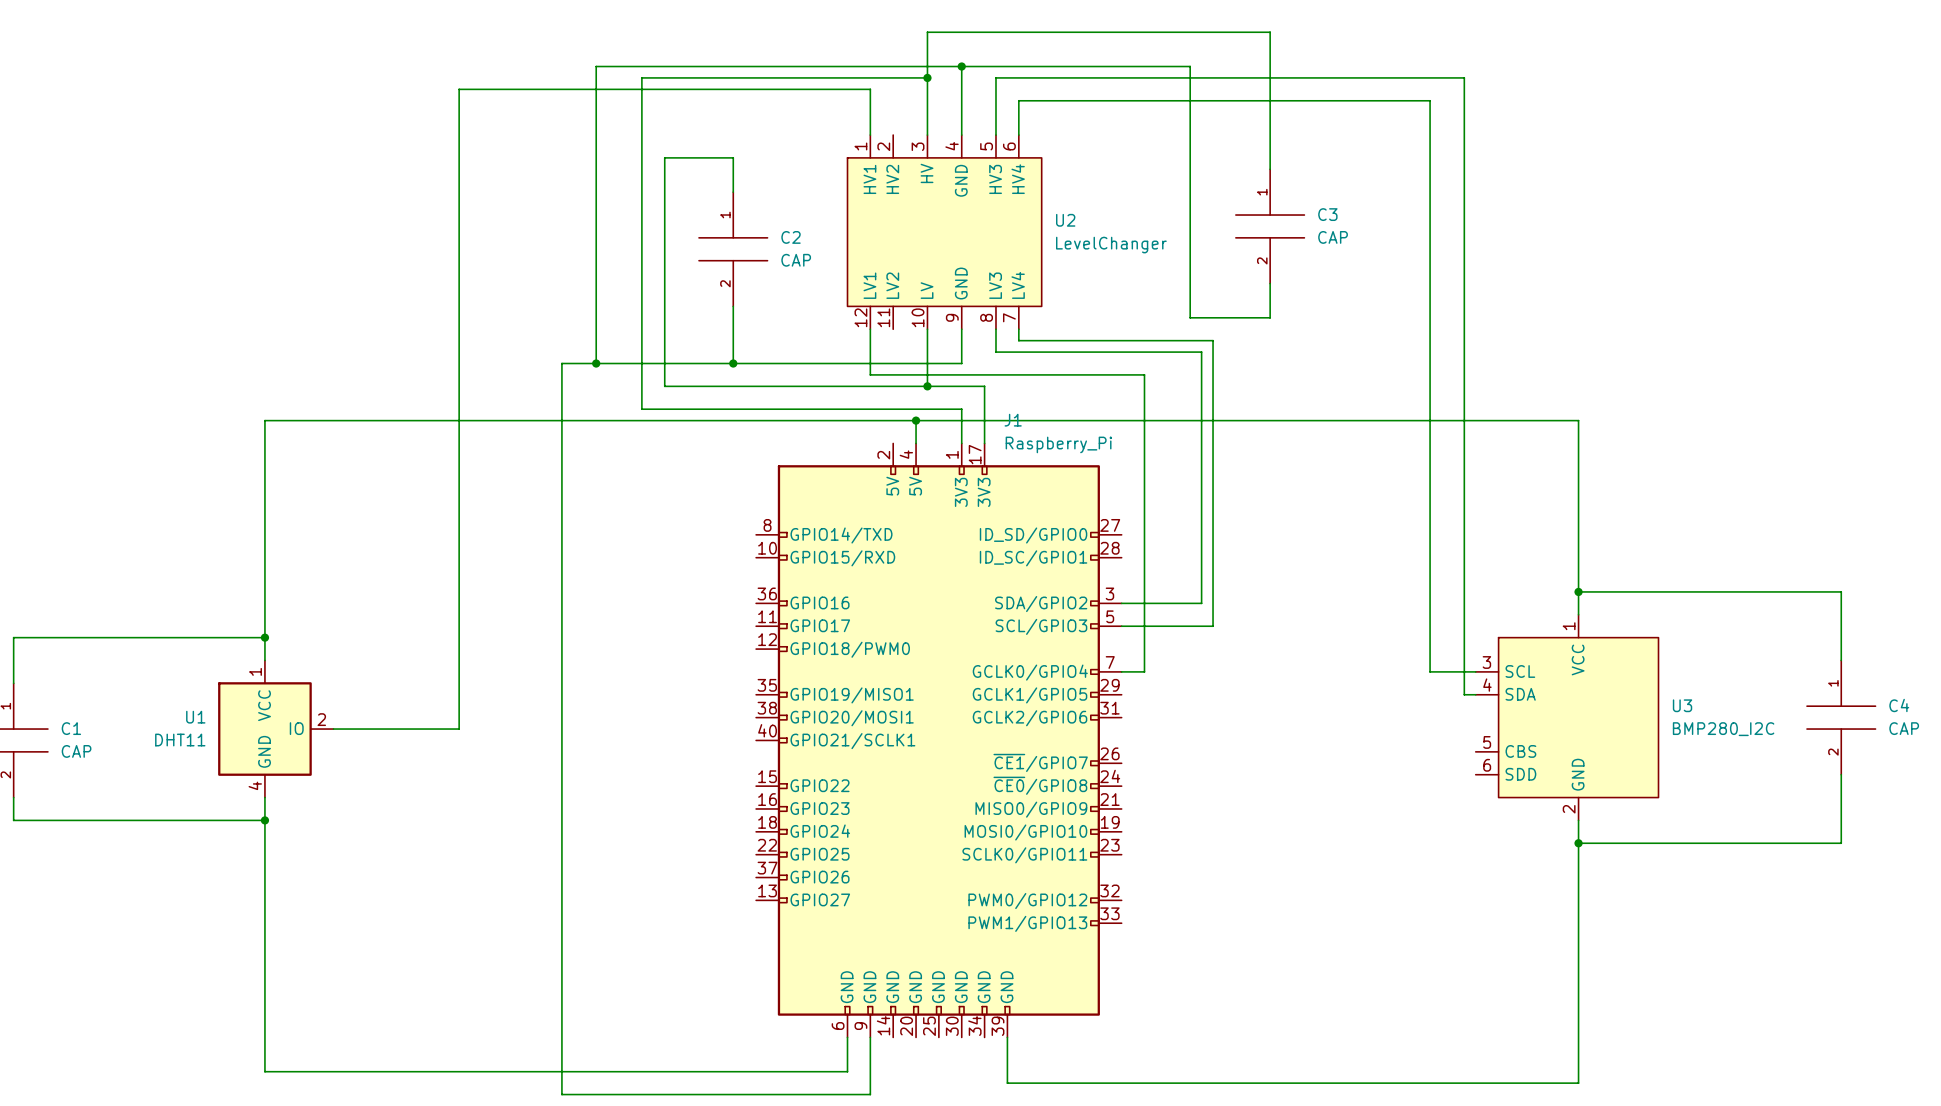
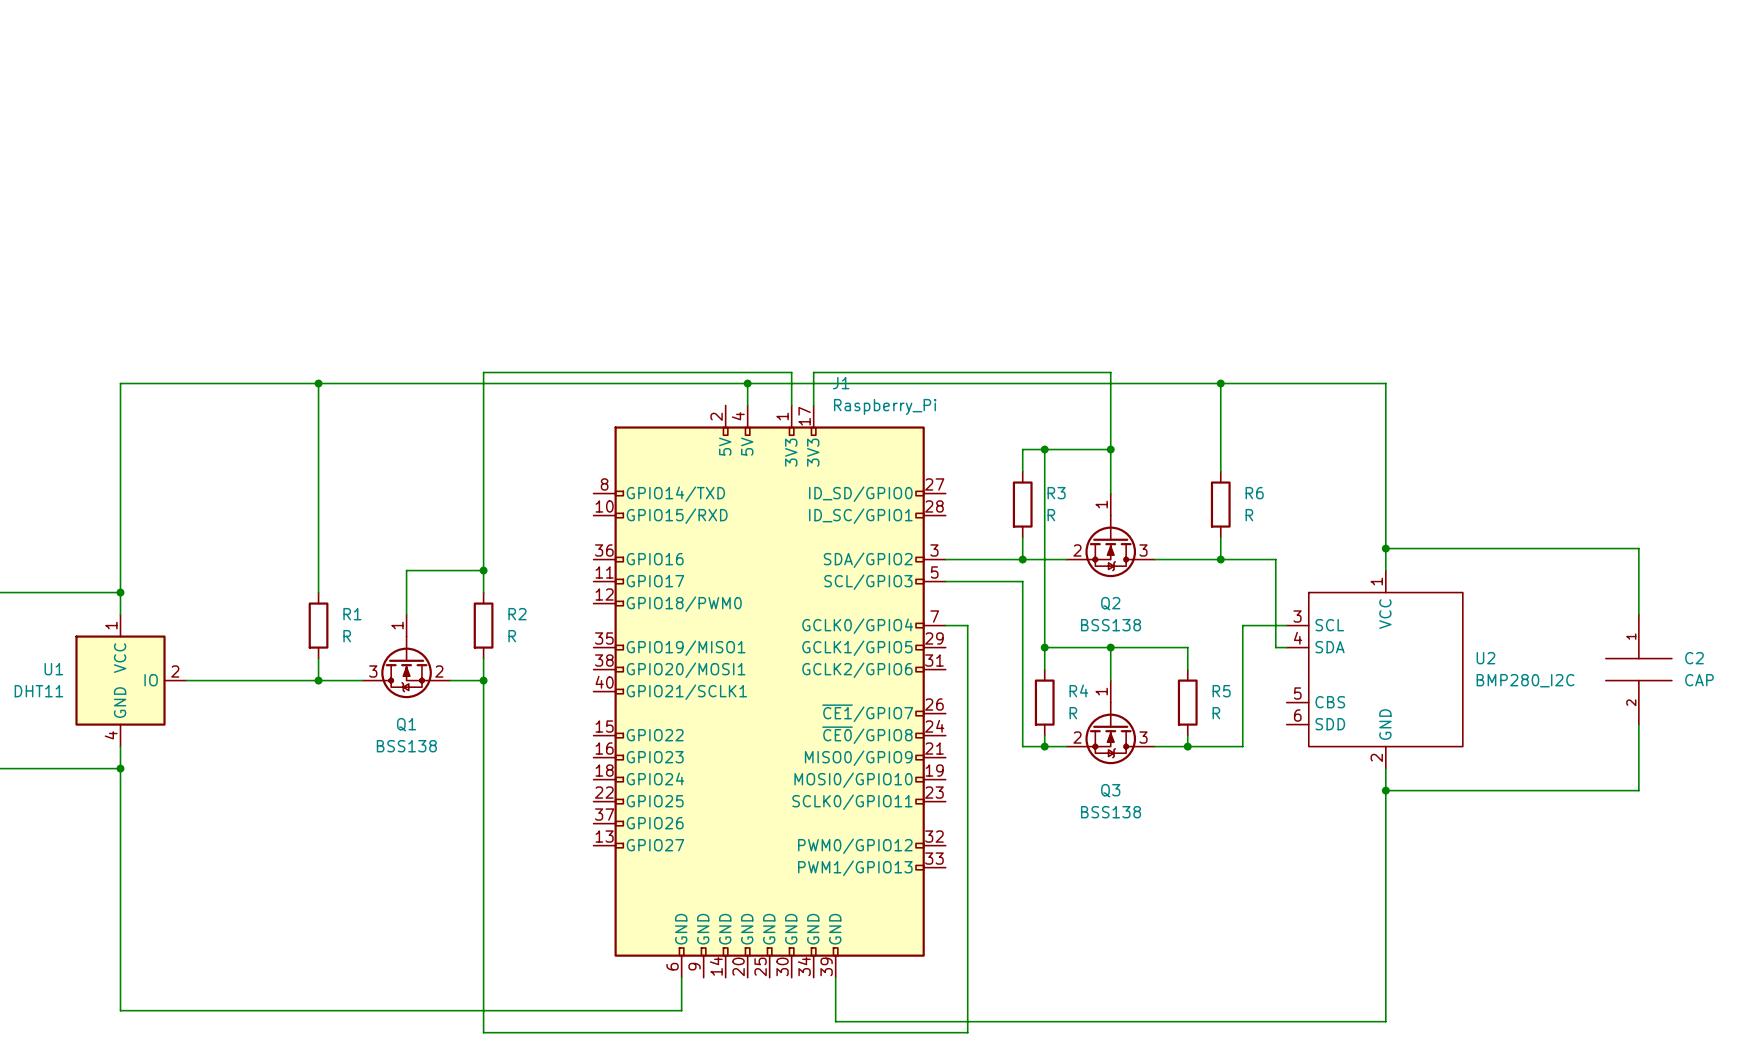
wire: (961, 66) (961, 135) -> none
junction: (961, 66) -> none
wire: (927, 77) (641, 77) (641, 409) -> (483, 592) (483, 372)
junction: (927, 77) -> none
U2 symbol: [847, 135, 1042, 330] -> [1286, 570, 1463, 769]
wire: (870, 135) (870, 89) (459, 89) (459, 729) -> (362, 680) (307, 680)
wire: (927, 135) (927, 32) (1270, 32) (1270, 169) -> none
wire: (995, 135) (995, 77) (1464, 77) (1464, 603) -> (1154, 559) (1275, 559)
wire: (1018, 135) (1018, 100) (1430, 100) (1430, 671) -> (1154, 746) (1242, 746) (1242, 625)
wire: (733, 192) (733, 157) (664, 157) (664, 386) (984, 386) (984, 409) -> (1110, 493) (1110, 372) (813, 372)
C3: CAP (1270, 226) -> none
U2 value: LevelChanger (1111, 245) -> BMP280_I2C (1525, 680)
C2: CAP (733, 249) -> none
wire: (1270, 283) (1270, 317) (1190, 317) (1190, 66) (596, 66) (596, 363) -> none
wire: (733, 306) (733, 363) -> none
wire: (870, 329) (870, 374) (1144, 374) (1144, 671) -> none
wire: (927, 329) (927, 386) -> none
wire: (961, 329) (961, 363) (561, 363) (561, 614) -> (483, 570) (406, 570)
wire: (995, 329) (995, 352) (1201, 352) (1201, 489) -> (1110, 449) (1022, 449)
wire: (1018, 329) (1018, 340) (1213, 340) (1213, 626) (1201, 626) -> (1066, 746) (1022, 746) (1022, 581)
junction: (596, 363) -> none
junction: (733, 363) -> none
junction: (927, 386) -> none
wire: none -> (318, 383) (318, 592)
junction: none -> (318, 383)
wire: none -> (1220, 383) (1220, 471)
junction: none -> (1220, 383)
wire: none -> (1044, 449) (1044, 669)
junction: none -> (1044, 449)
junction: none -> (1110, 449)
wire: (1201, 512) (1201, 580) -> none
R3: none -> R (1022, 504)
R6: none -> R (1220, 504)
Q2: none -> BSS138 (1110, 535)
wire: none -> (1220, 537) (1220, 559)
wire: none -> (1022, 559) (1066, 559)
junction: none -> (1022, 559)
junction: none -> (1220, 559)
junction: none -> (483, 570)
wire: (561, 660) (561, 1094) (641, 1094) -> (483, 658) (483, 1032)
R1: none -> R (318, 625)
R2: none -> R (483, 625)
wire: none -> (1044, 647) (1187, 647) (1187, 669)
junction: none -> (1044, 647)
wire: none -> (1110, 647) (1110, 680)
junction: none -> (1110, 647)
Q1: none -> BSS138 (406, 656)
C4 name: C4 (1899, 705) -> C2 (1694, 658)
wire: none -> (318, 658) (318, 680)
U3: BMP280_I2C (1567, 717) -> none
junction: none -> (318, 680)
wire: none -> (450, 680) (483, 680)
junction: none -> (483, 680)
R4: none -> R (1044, 702)
R5: none -> R (1187, 702)
Q3: none -> BSS138 (1110, 722)
wire: none -> (1044, 735) (1044, 746)
wire: none -> (1187, 735) (1187, 746)
junction: none -> (1044, 746)
junction: none -> (1187, 746)
wire: (870, 1037) (870, 1094) -> (967, 625) (967, 1032) (703, 1032)

